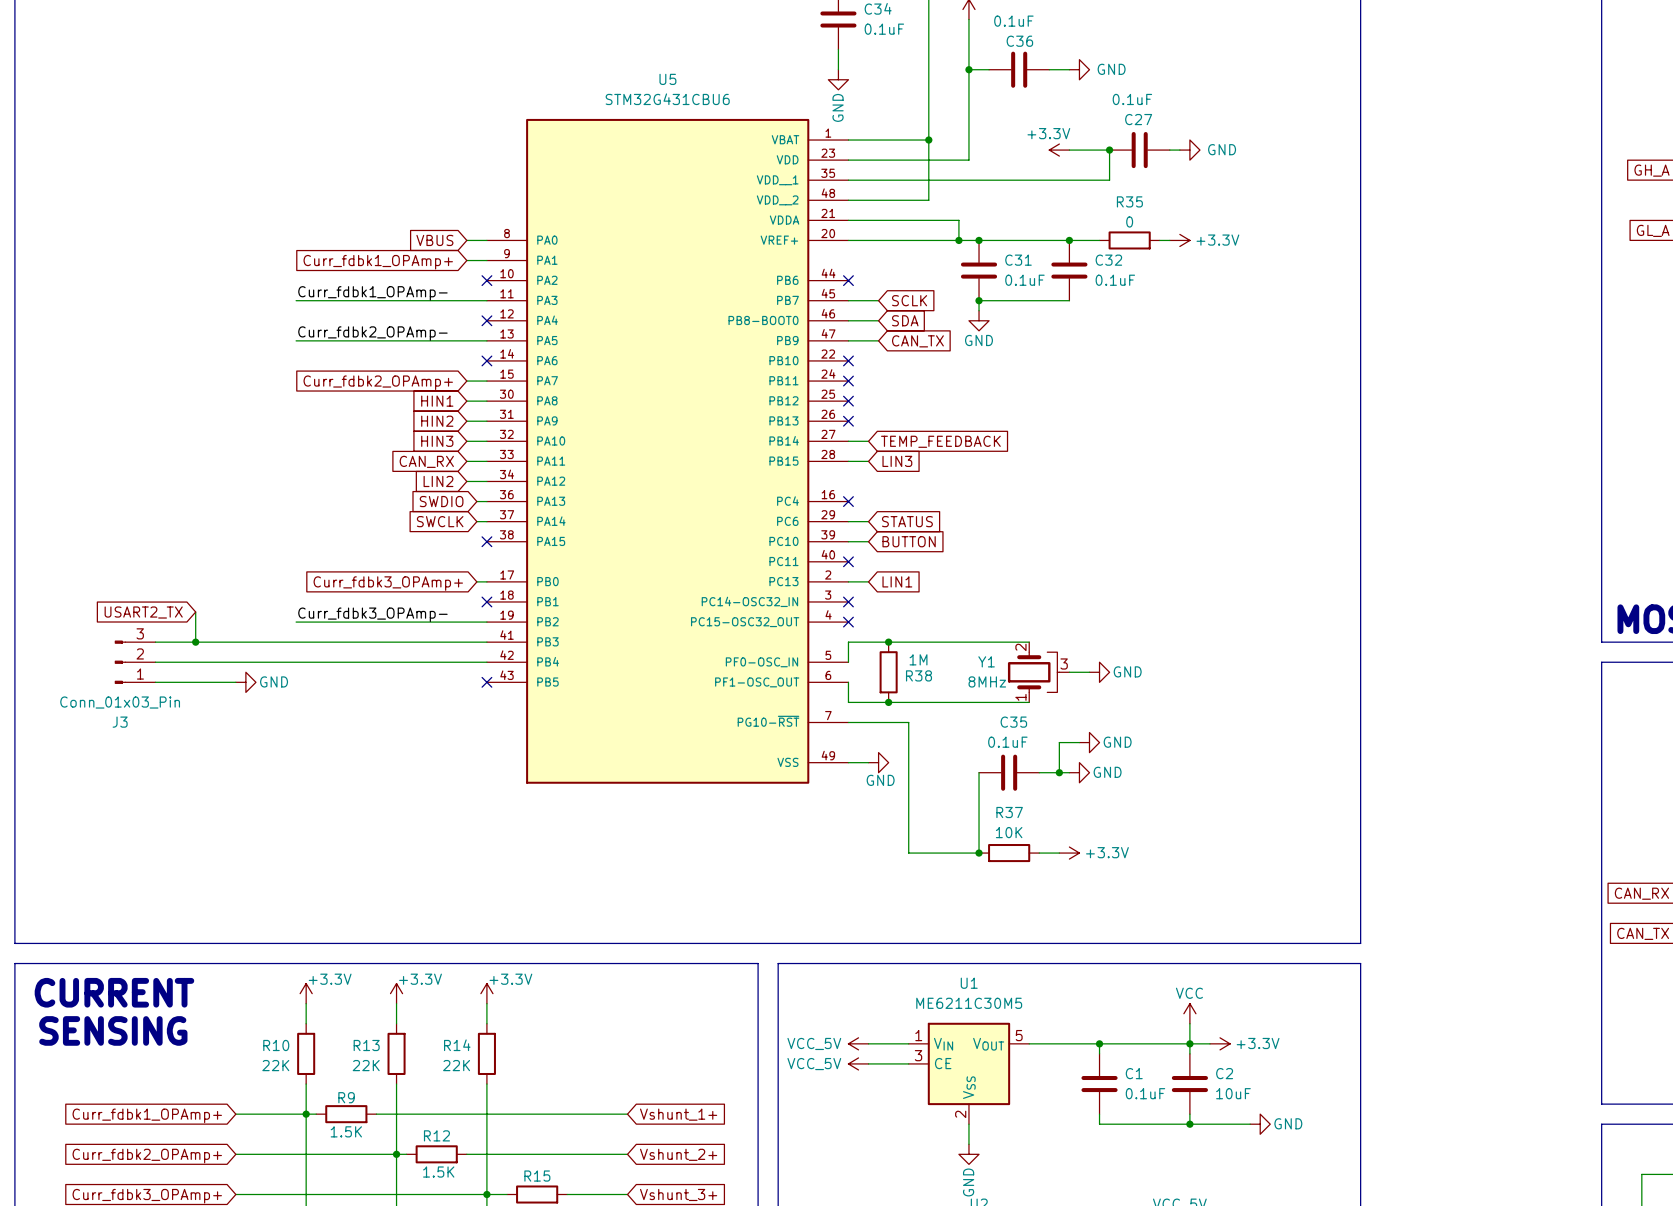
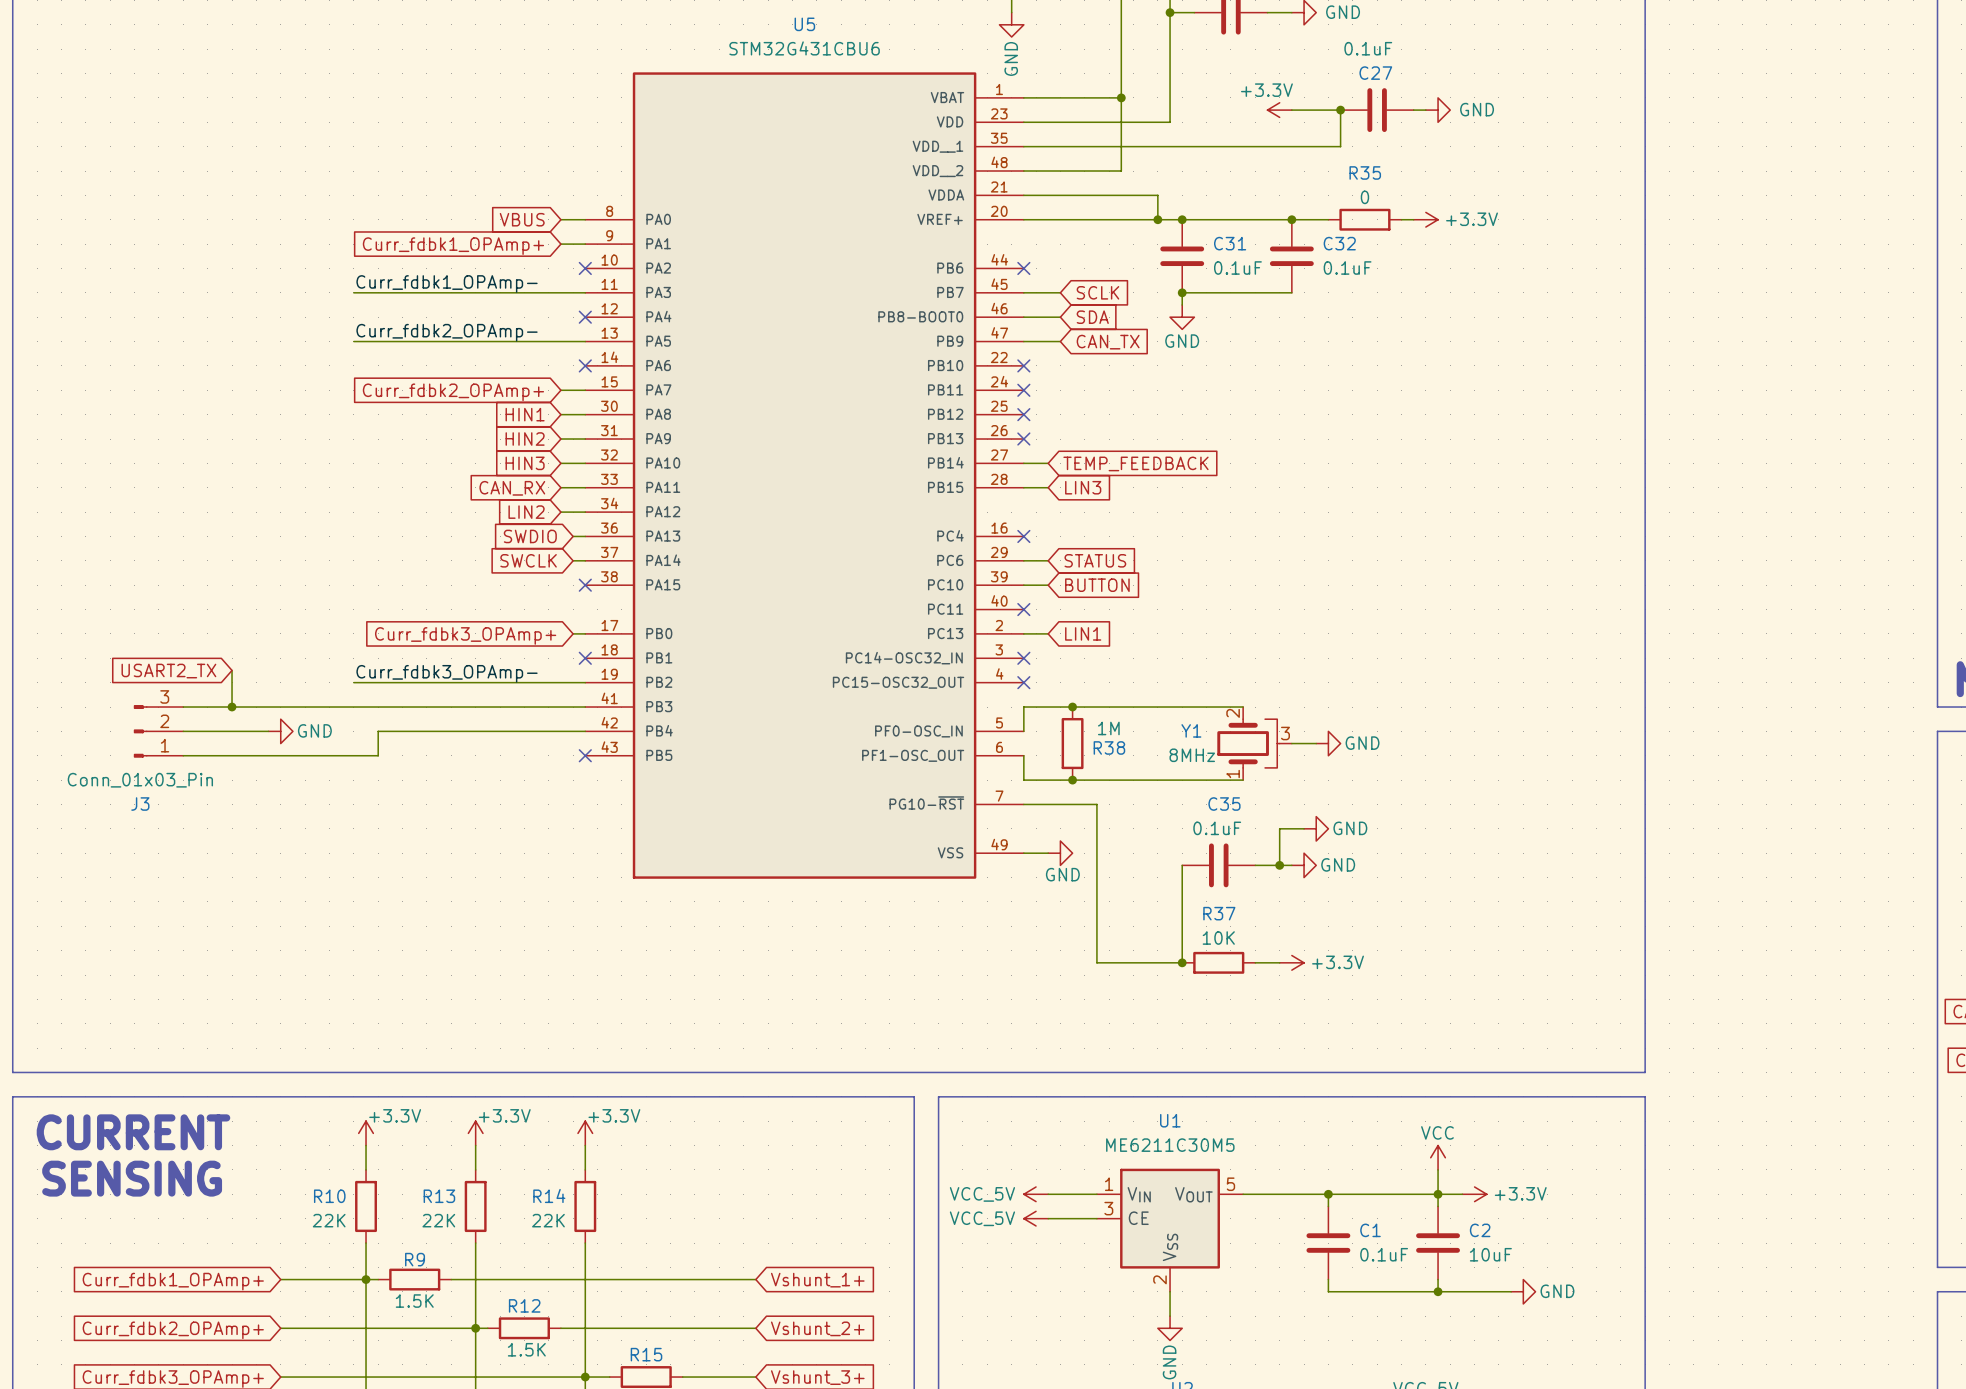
wire: (225, 662) (316, 662) -> (280, 755) (378, 755) (378, 731)
power symbol position: GND (245, 682) -> GND (280, 731)

